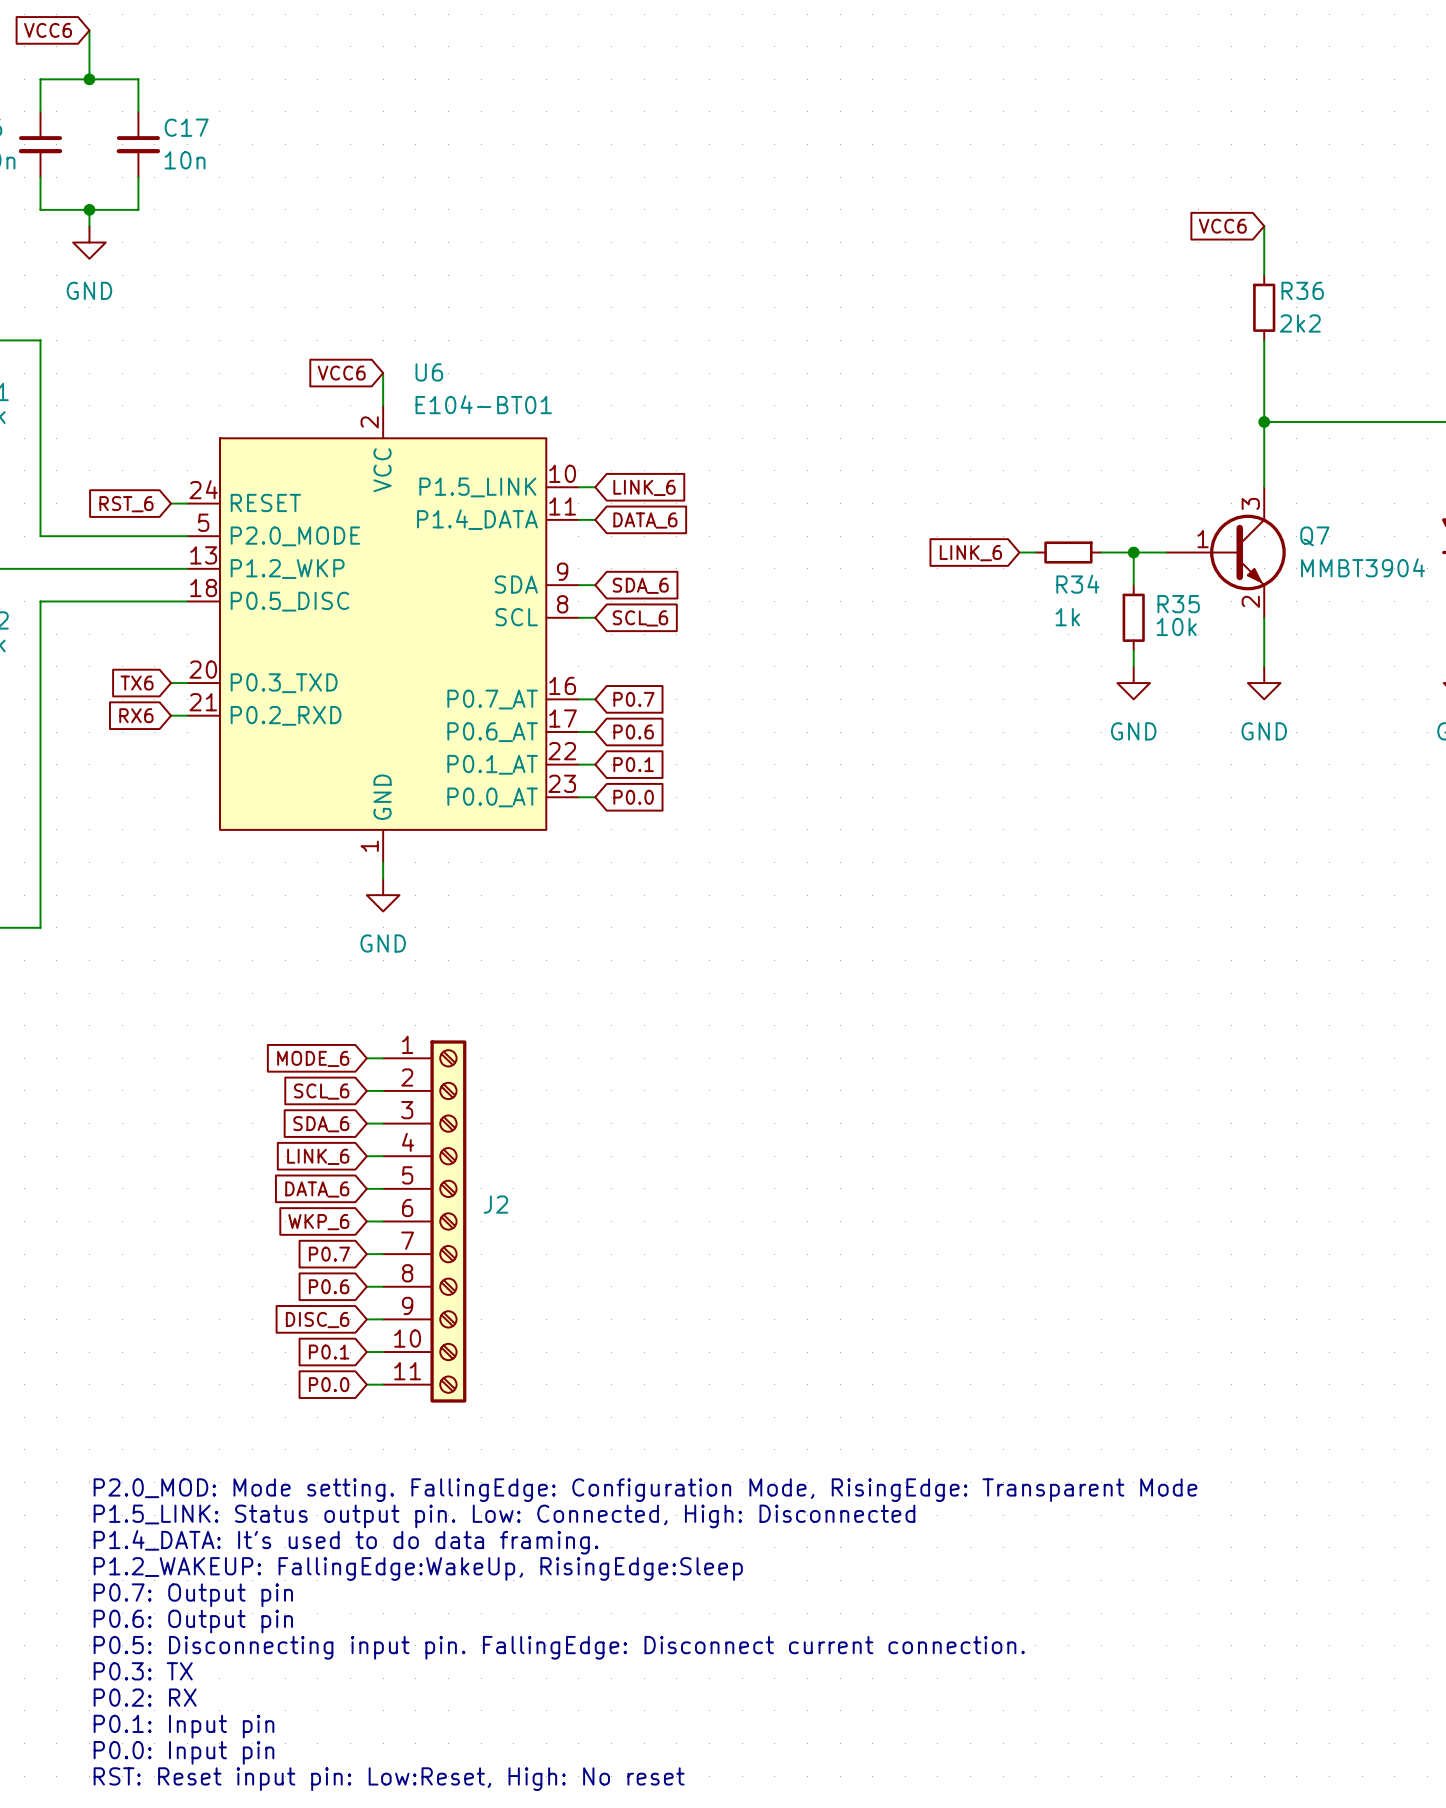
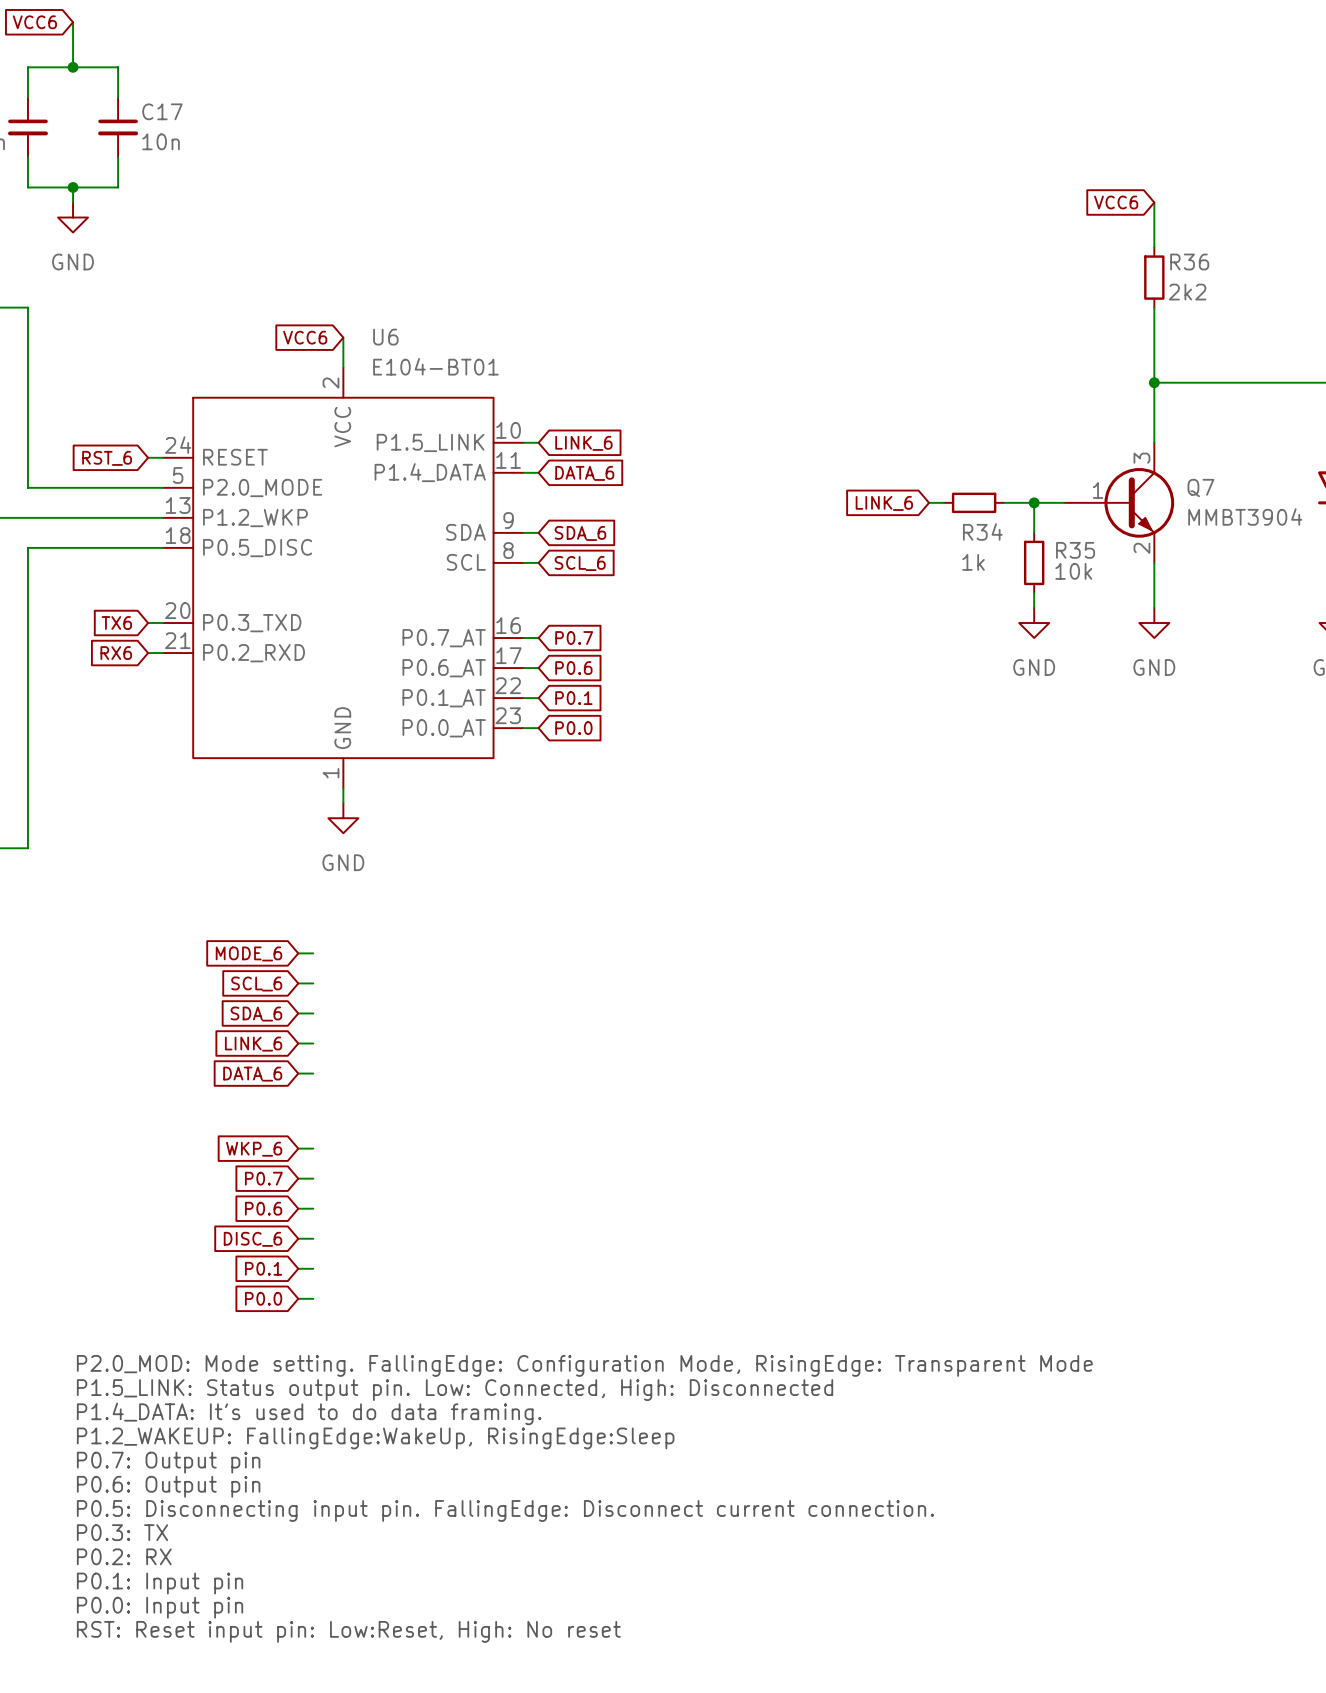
global label position: MODE_6 (313, 1058) -> MODE_6 (248, 953)
wire: (366, 1058) (383, 1058) -> (298, 953) (313, 953)
wire: (366, 1090) (383, 1090) -> (298, 983) (313, 983)
global label position: SCL_6 (321, 1091) -> SCL_6 (256, 984)
wire: (366, 1123) (383, 1123) -> (298, 1013) (313, 1013)
global label position: SDA_6 (321, 1124) -> SDA_6 (256, 1014)
global label position: LINK_6 (318, 1156) -> LINK_6 (253, 1044)
wire: (366, 1156) (383, 1156) -> (298, 1043) (313, 1043)
wire: (366, 1188) (383, 1188) -> (298, 1073) (313, 1073)
global label position: DATA_6 (317, 1189) -> DATA_6 (252, 1074)
wire: (366, 1221) (383, 1221) -> (298, 1148) (313, 1148)
J2: (424, 1221) -> none
global label position: WKP_6 (318, 1222) -> WKP_6 (254, 1149)
global label position: P0.7 (329, 1254) -> P0.7 (263, 1178)
wire: (366, 1254) (383, 1254) -> (298, 1178) (313, 1178)
global label position: P0.6 (329, 1286) -> P0.6 (263, 1208)
wire: (366, 1286) (383, 1286) -> (298, 1208) (313, 1208)
wire: (366, 1319) (383, 1319) -> (298, 1238) (313, 1238)
global label position: DISC_6 (317, 1320) -> DISC_6 (252, 1239)
global label position: P0.1 (329, 1352) -> P0.1 (263, 1268)
wire: (366, 1352) (383, 1352) -> (298, 1268) (313, 1268)
global label position: P0.0 (329, 1384) -> P0.0 (263, 1298)
wire: (366, 1384) (383, 1384) -> (298, 1298) (313, 1298)

